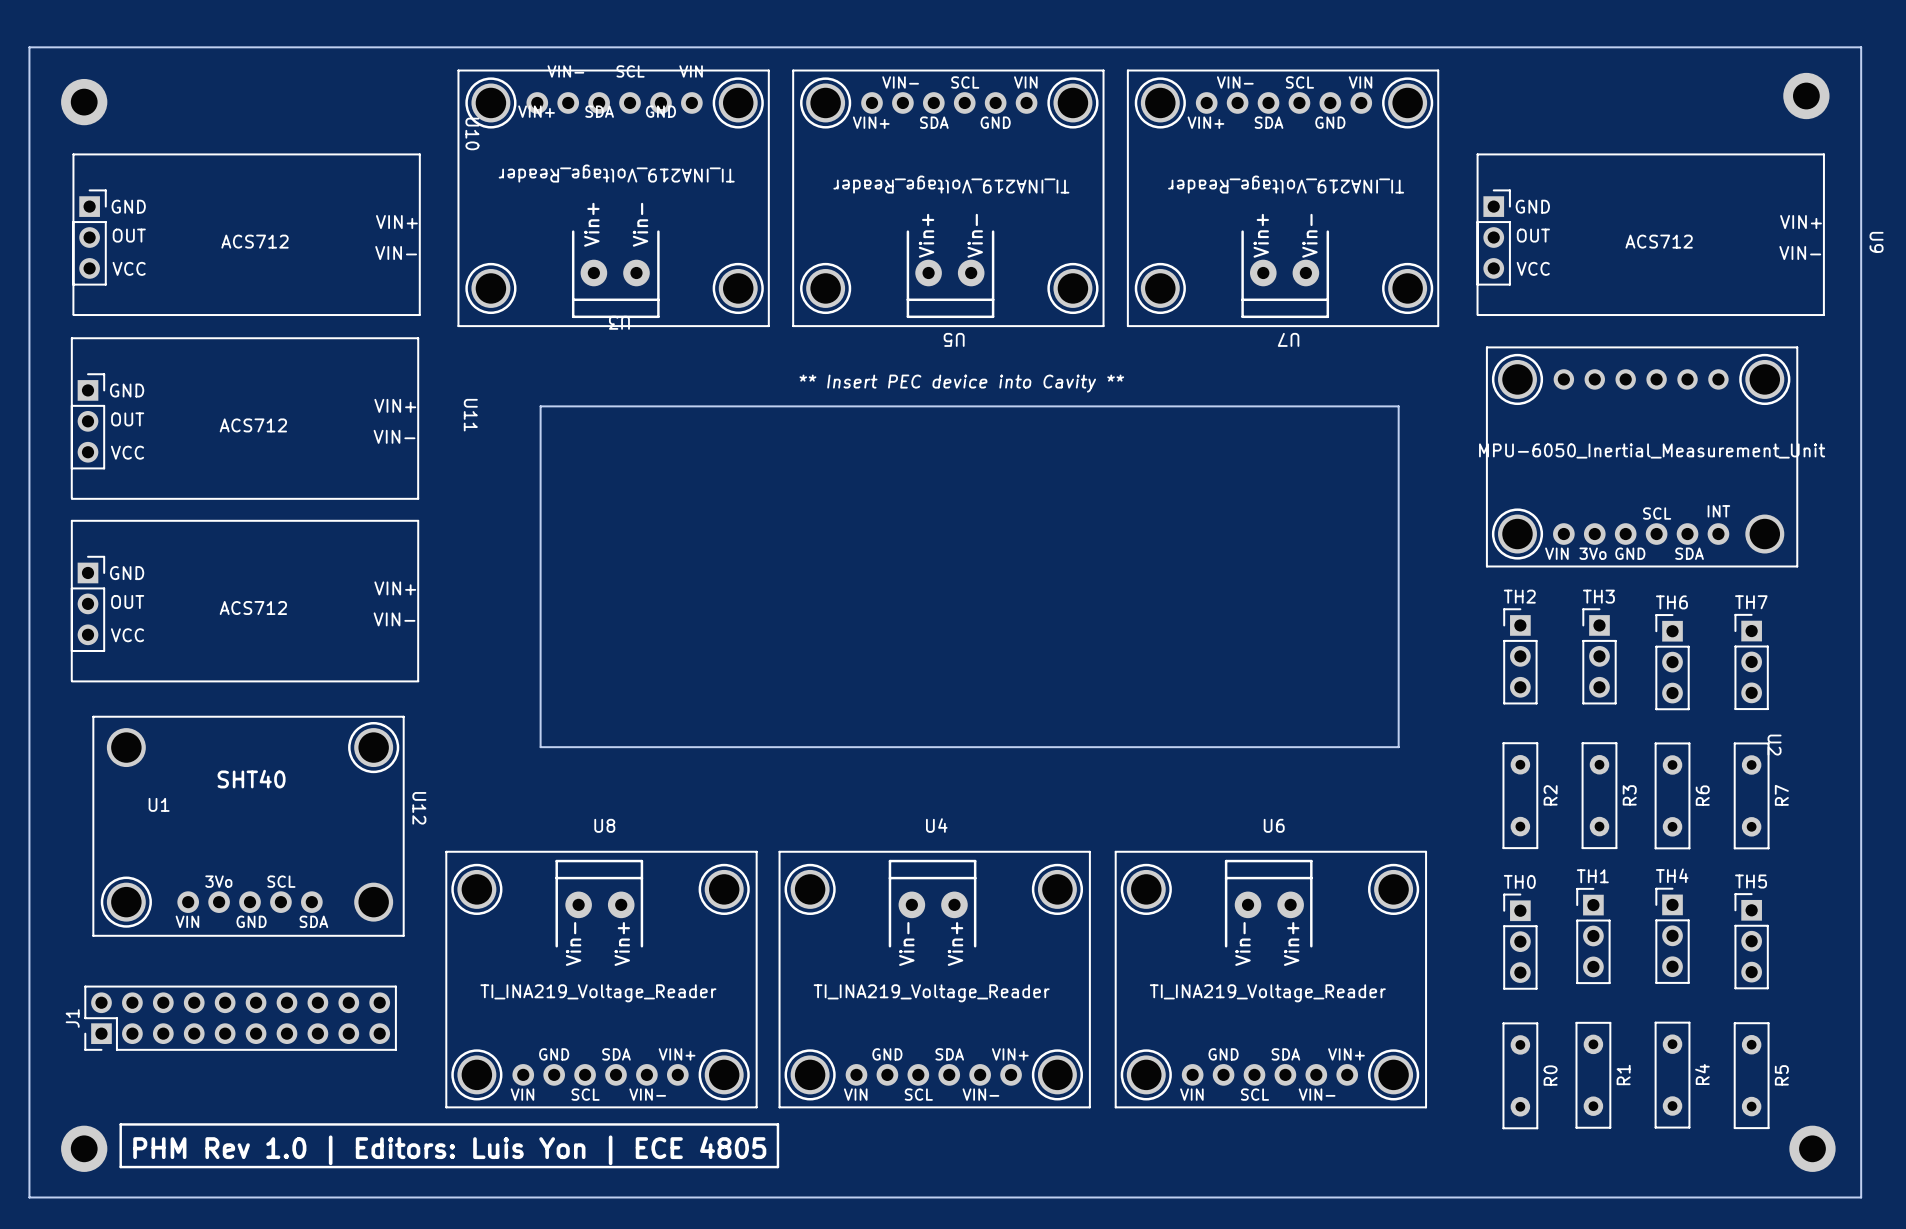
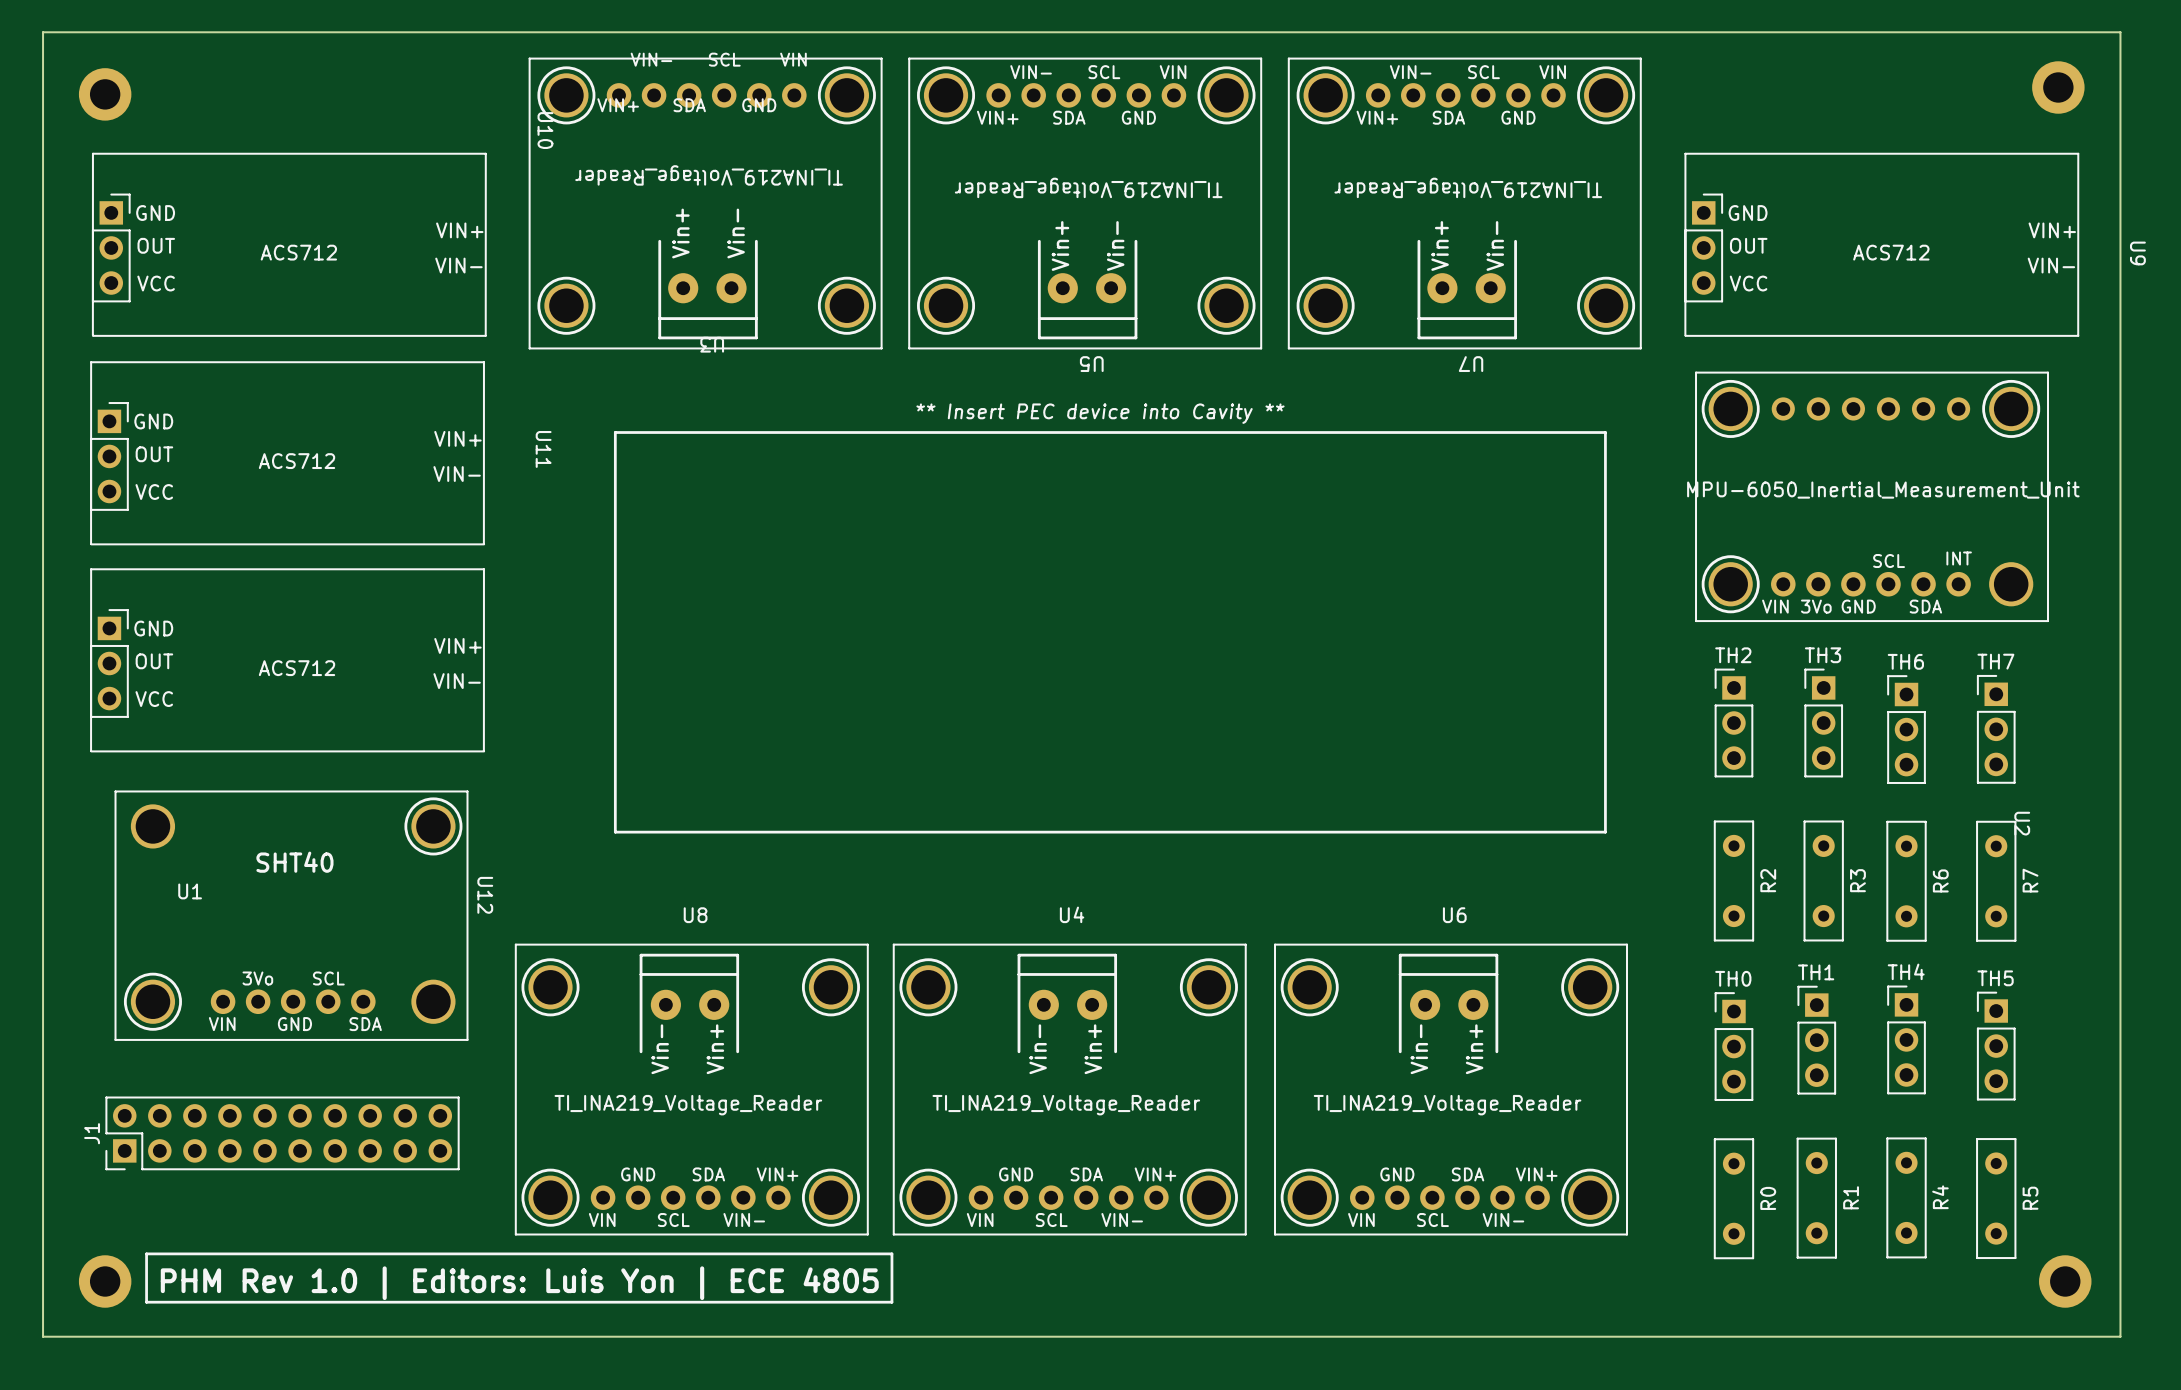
line: none -> (615, 432) (1605, 432) (1605, 832) (615, 832) (615, 432)
board edge: (540, 406) (1398, 406) (1398, 747) (540, 747) (540, 406) -> none

